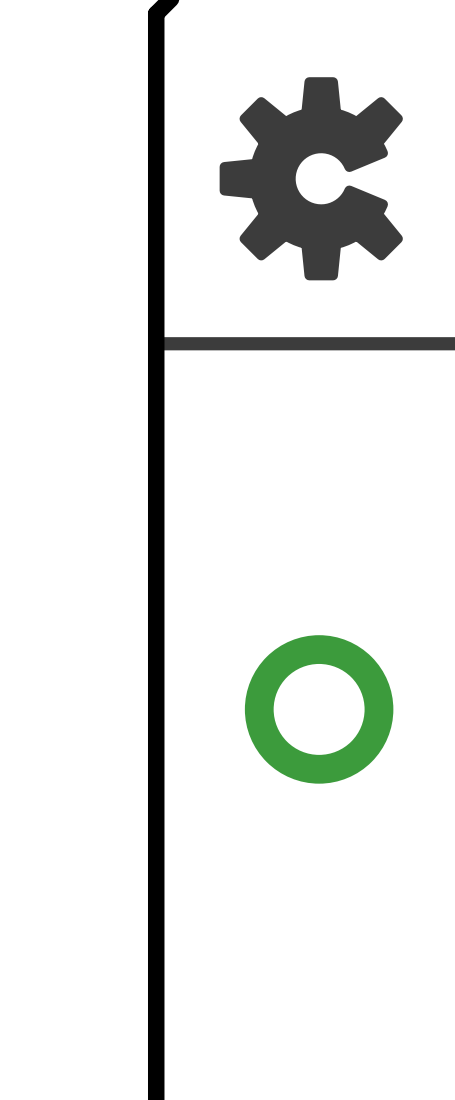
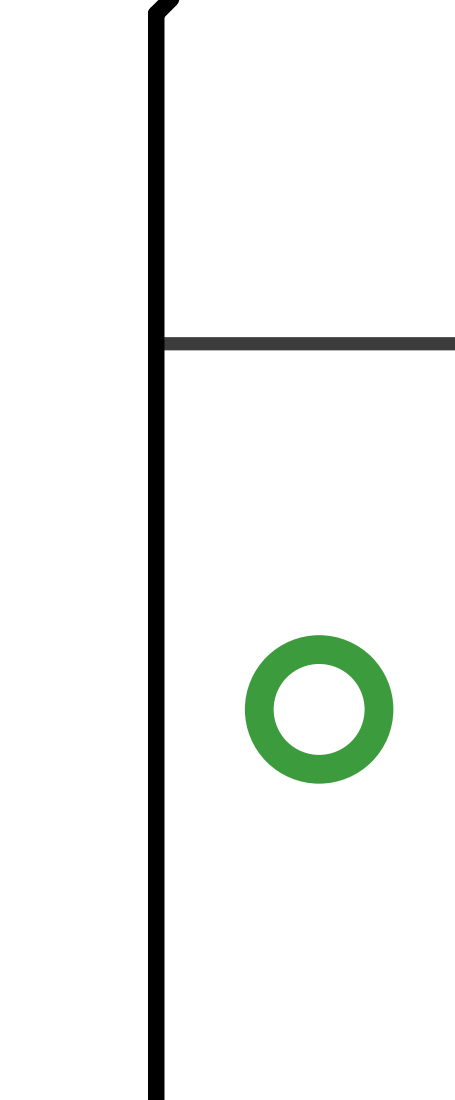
drawing: [219, 77, 403, 281] -> none

